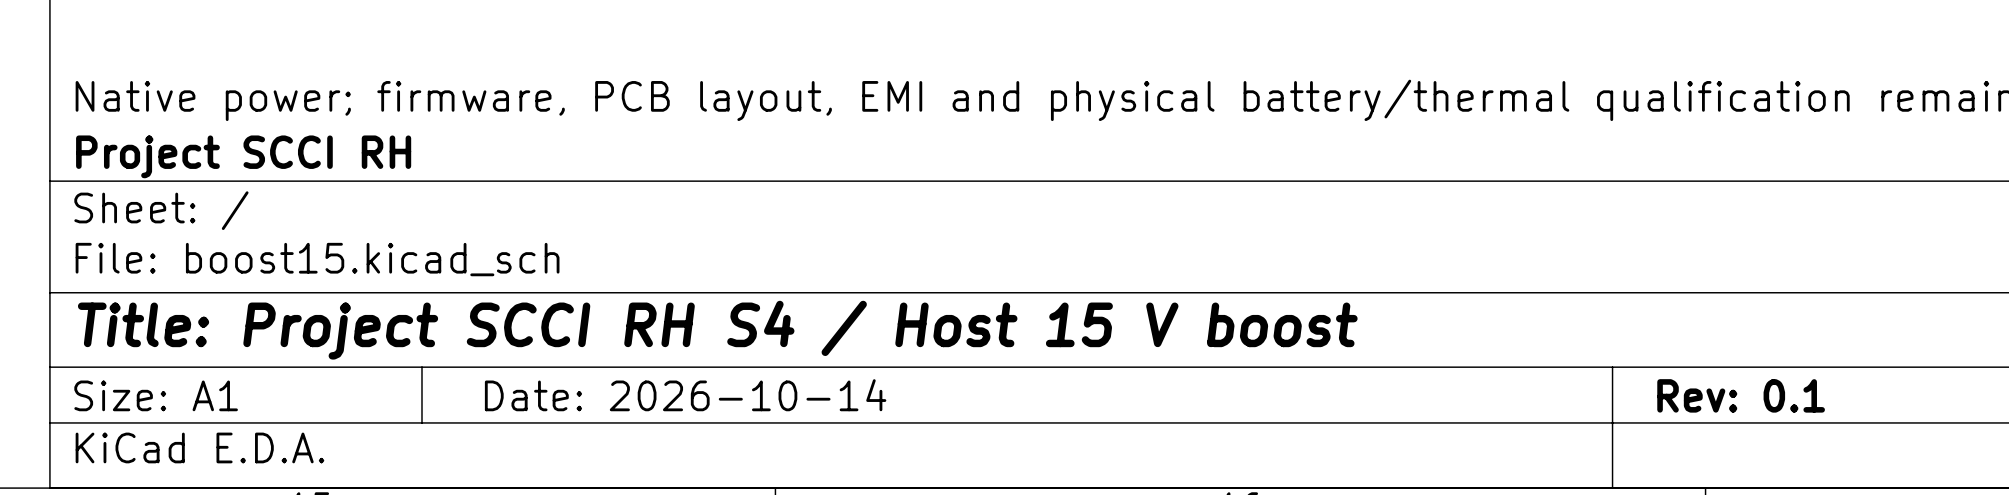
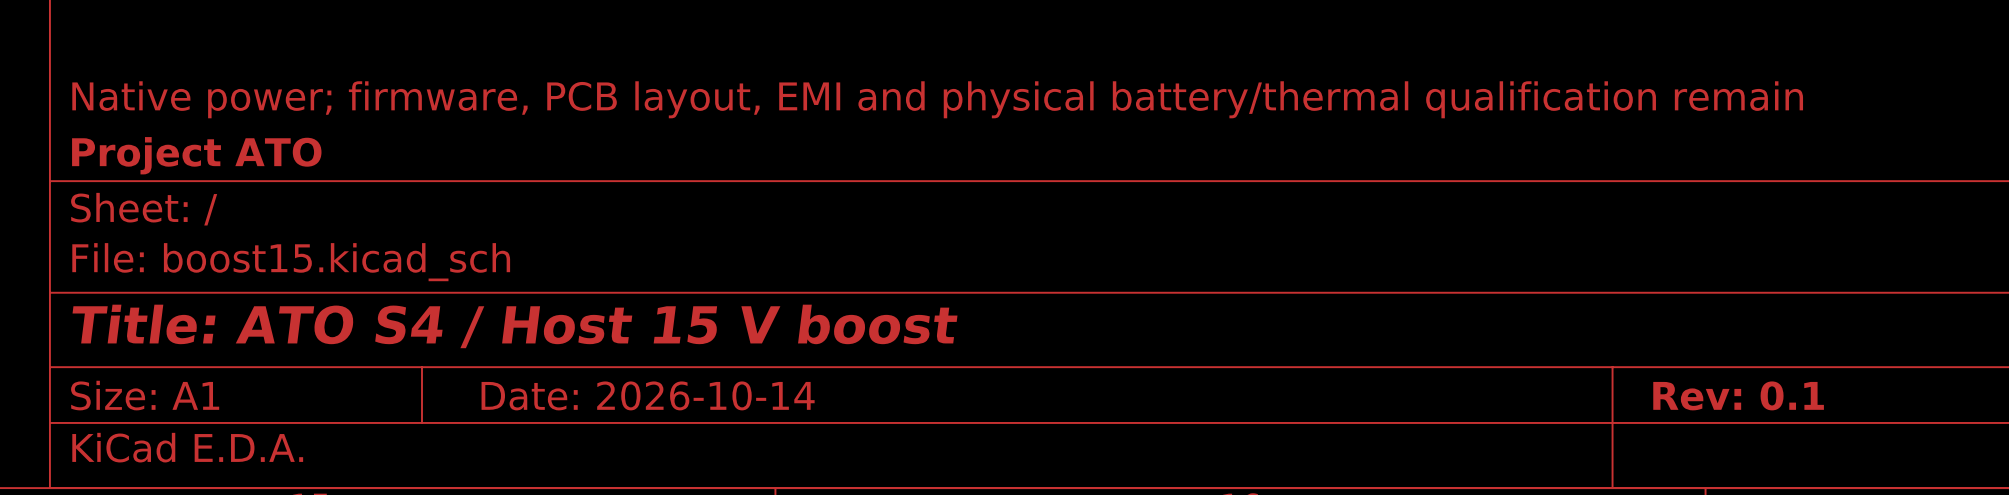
title block: Project SCCI RH (243, 156) -> Project ATO (196, 155)
title block: Title: Project SCCI RH S4 / Host 15 V boost (717, 330) -> Title: ATO S4 / Host 15 V boost (515, 326)

